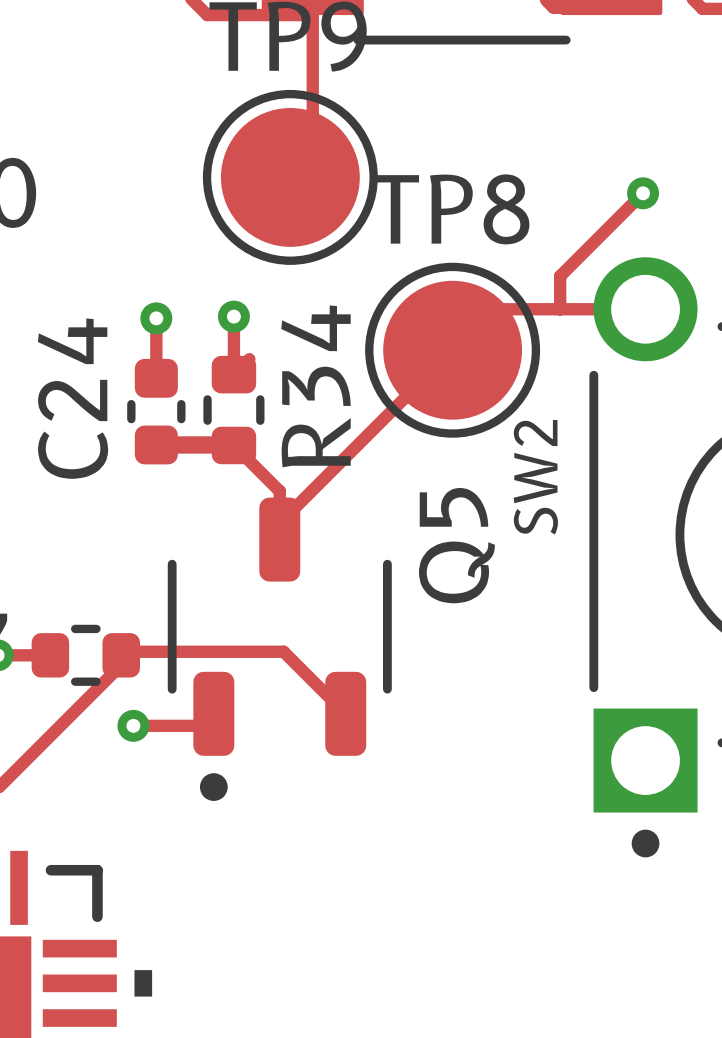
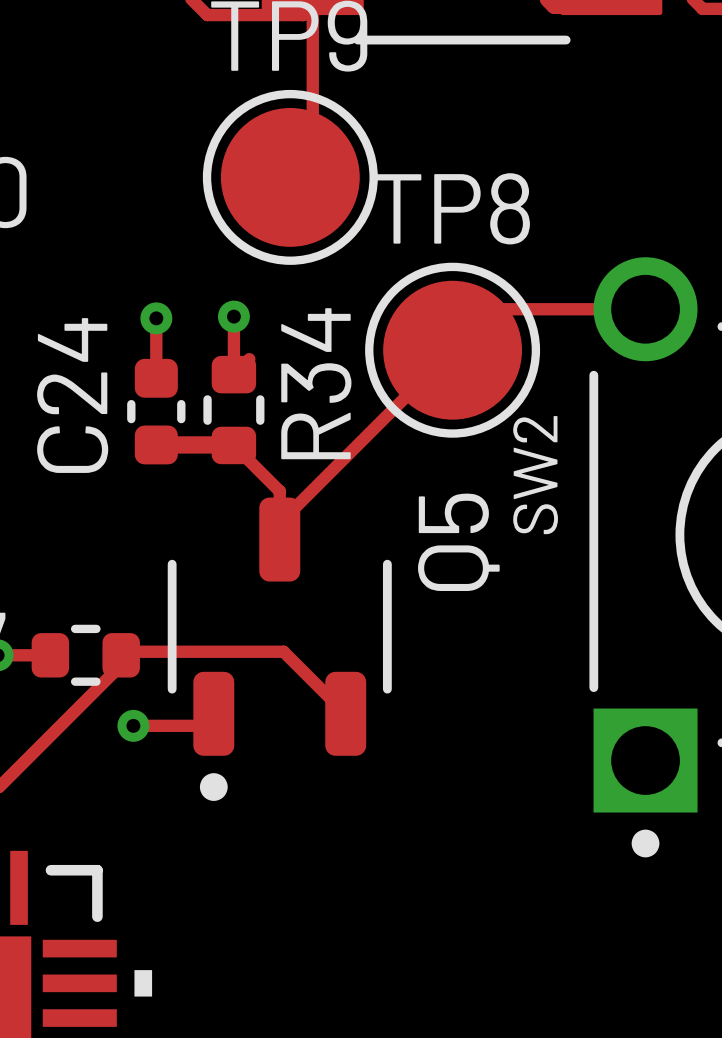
track: (643, 193) (560, 276) (560, 309) -> none
via: (643, 193) -> none

